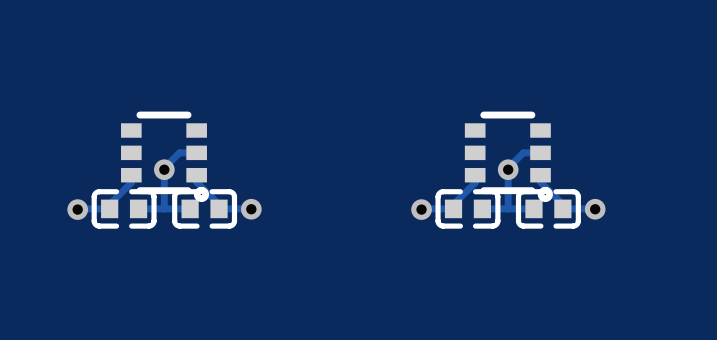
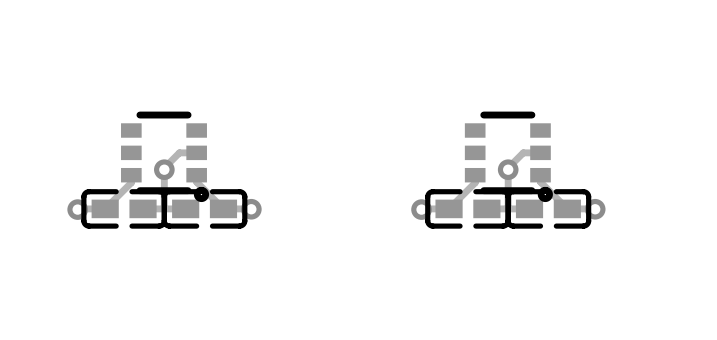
part footprint: [91, 189, 157, 229] -> [81, 189, 167, 229]
part footprint: [172, 189, 238, 229] -> [161, 189, 248, 229]
part footprint: [435, 189, 501, 229] -> [425, 189, 511, 229]
part footprint: [515, 189, 581, 229] -> [505, 189, 592, 229]

